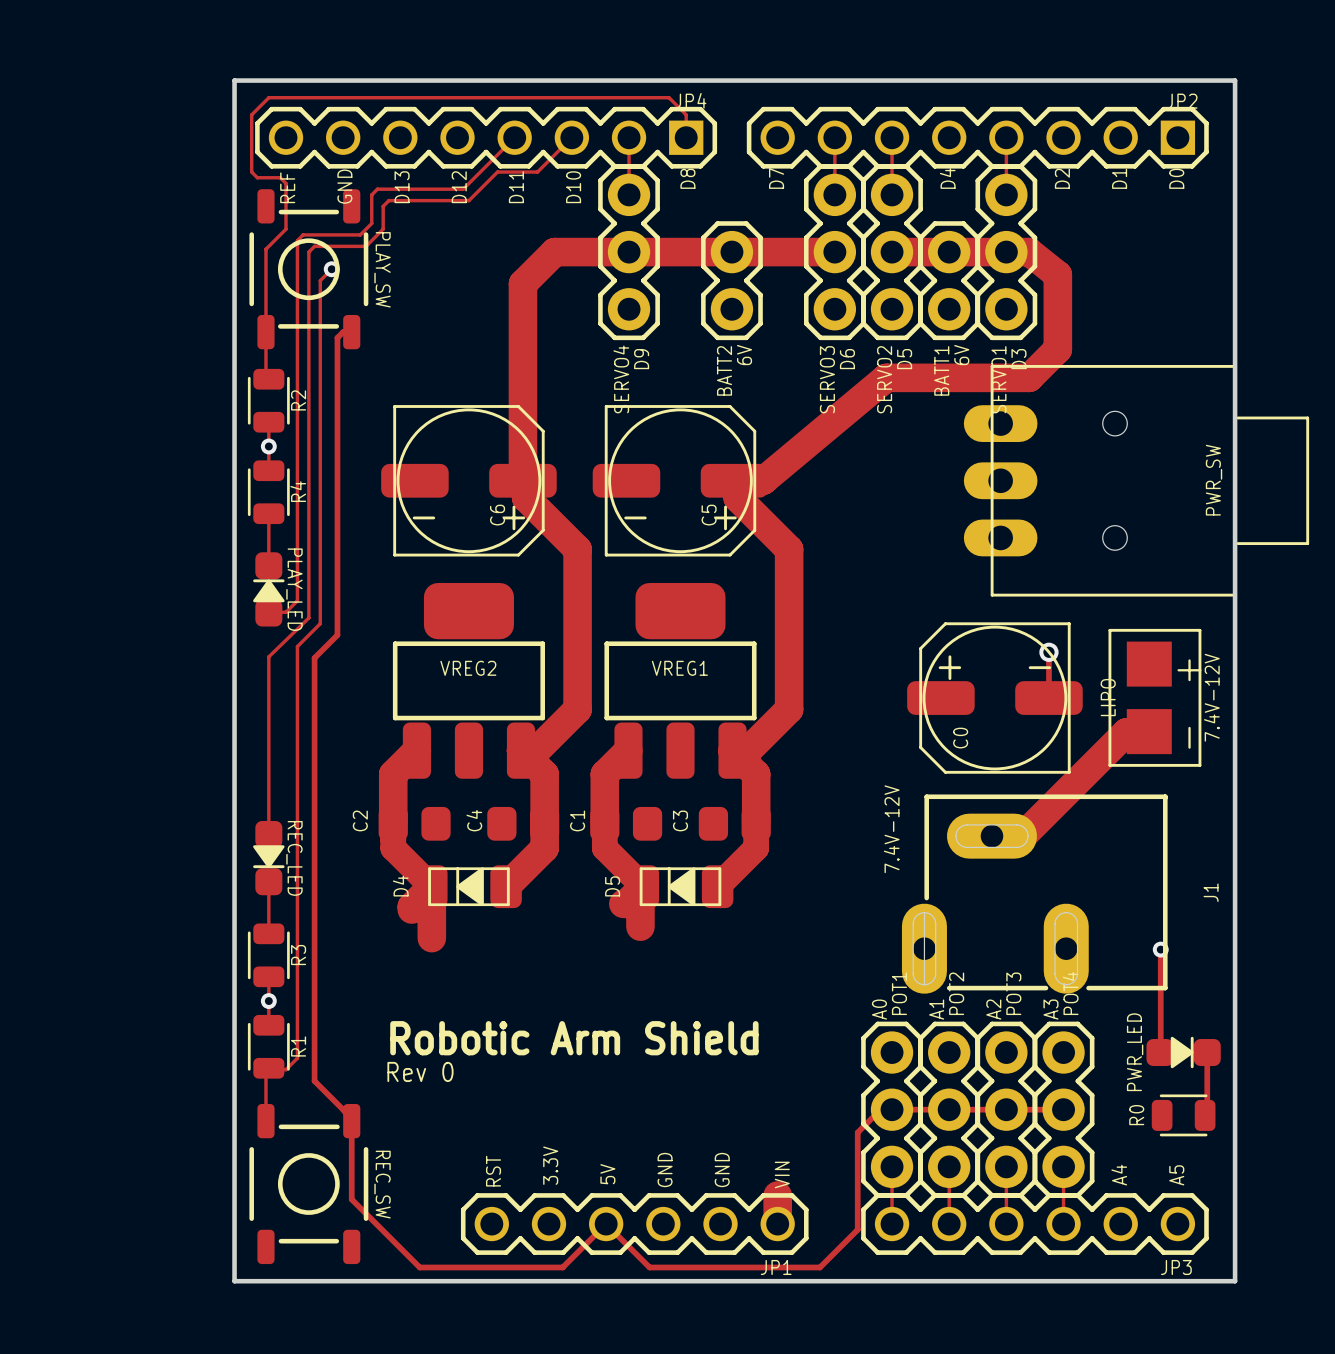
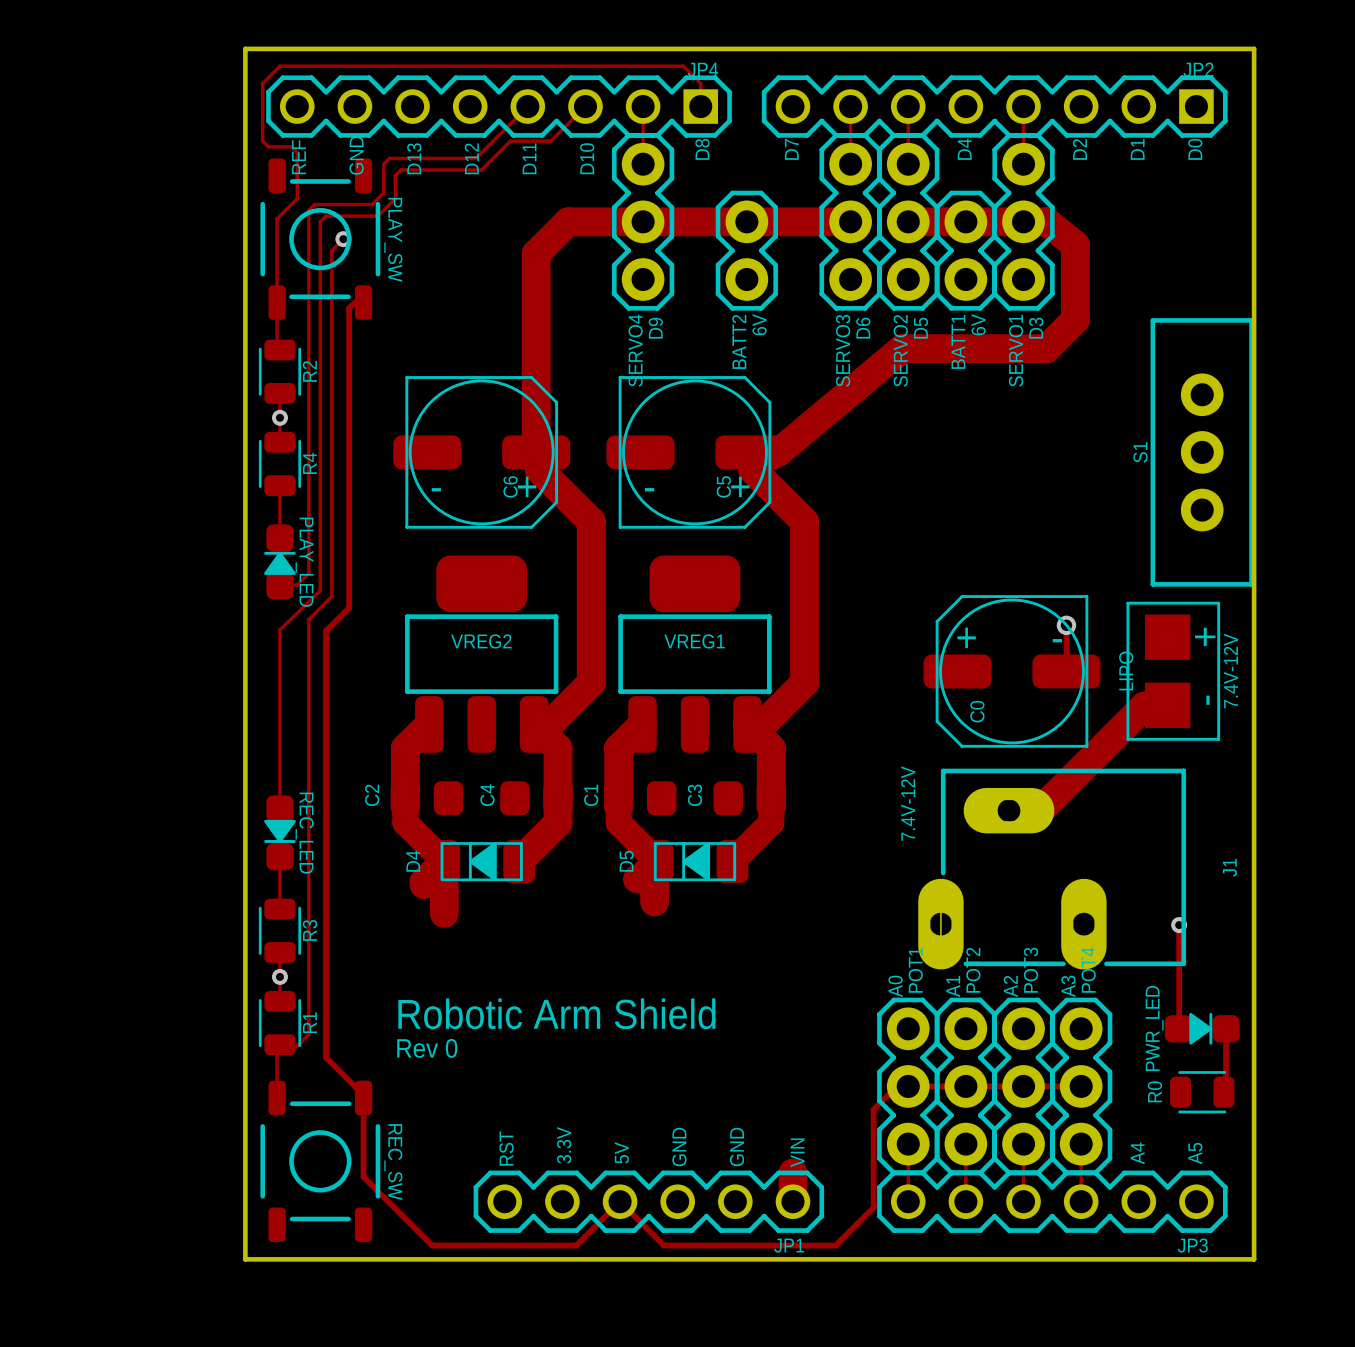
PWR_SW: (1136, 480) -> none
S1: none -> (1202, 452)

